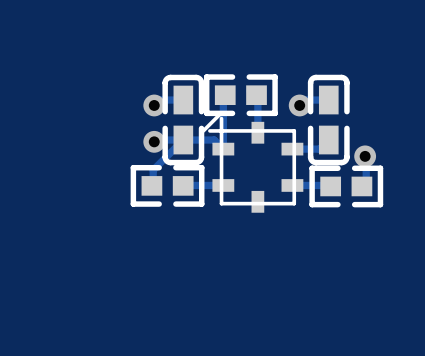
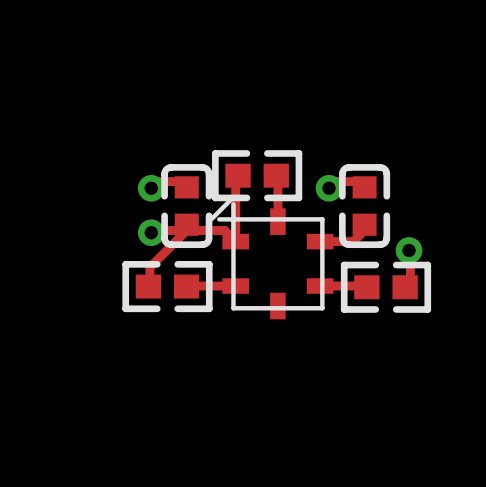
part footprint: [162, 74, 205, 166] -> [161, 164, 213, 249]
part footprint: [307, 74, 350, 166] -> [339, 164, 391, 249]

